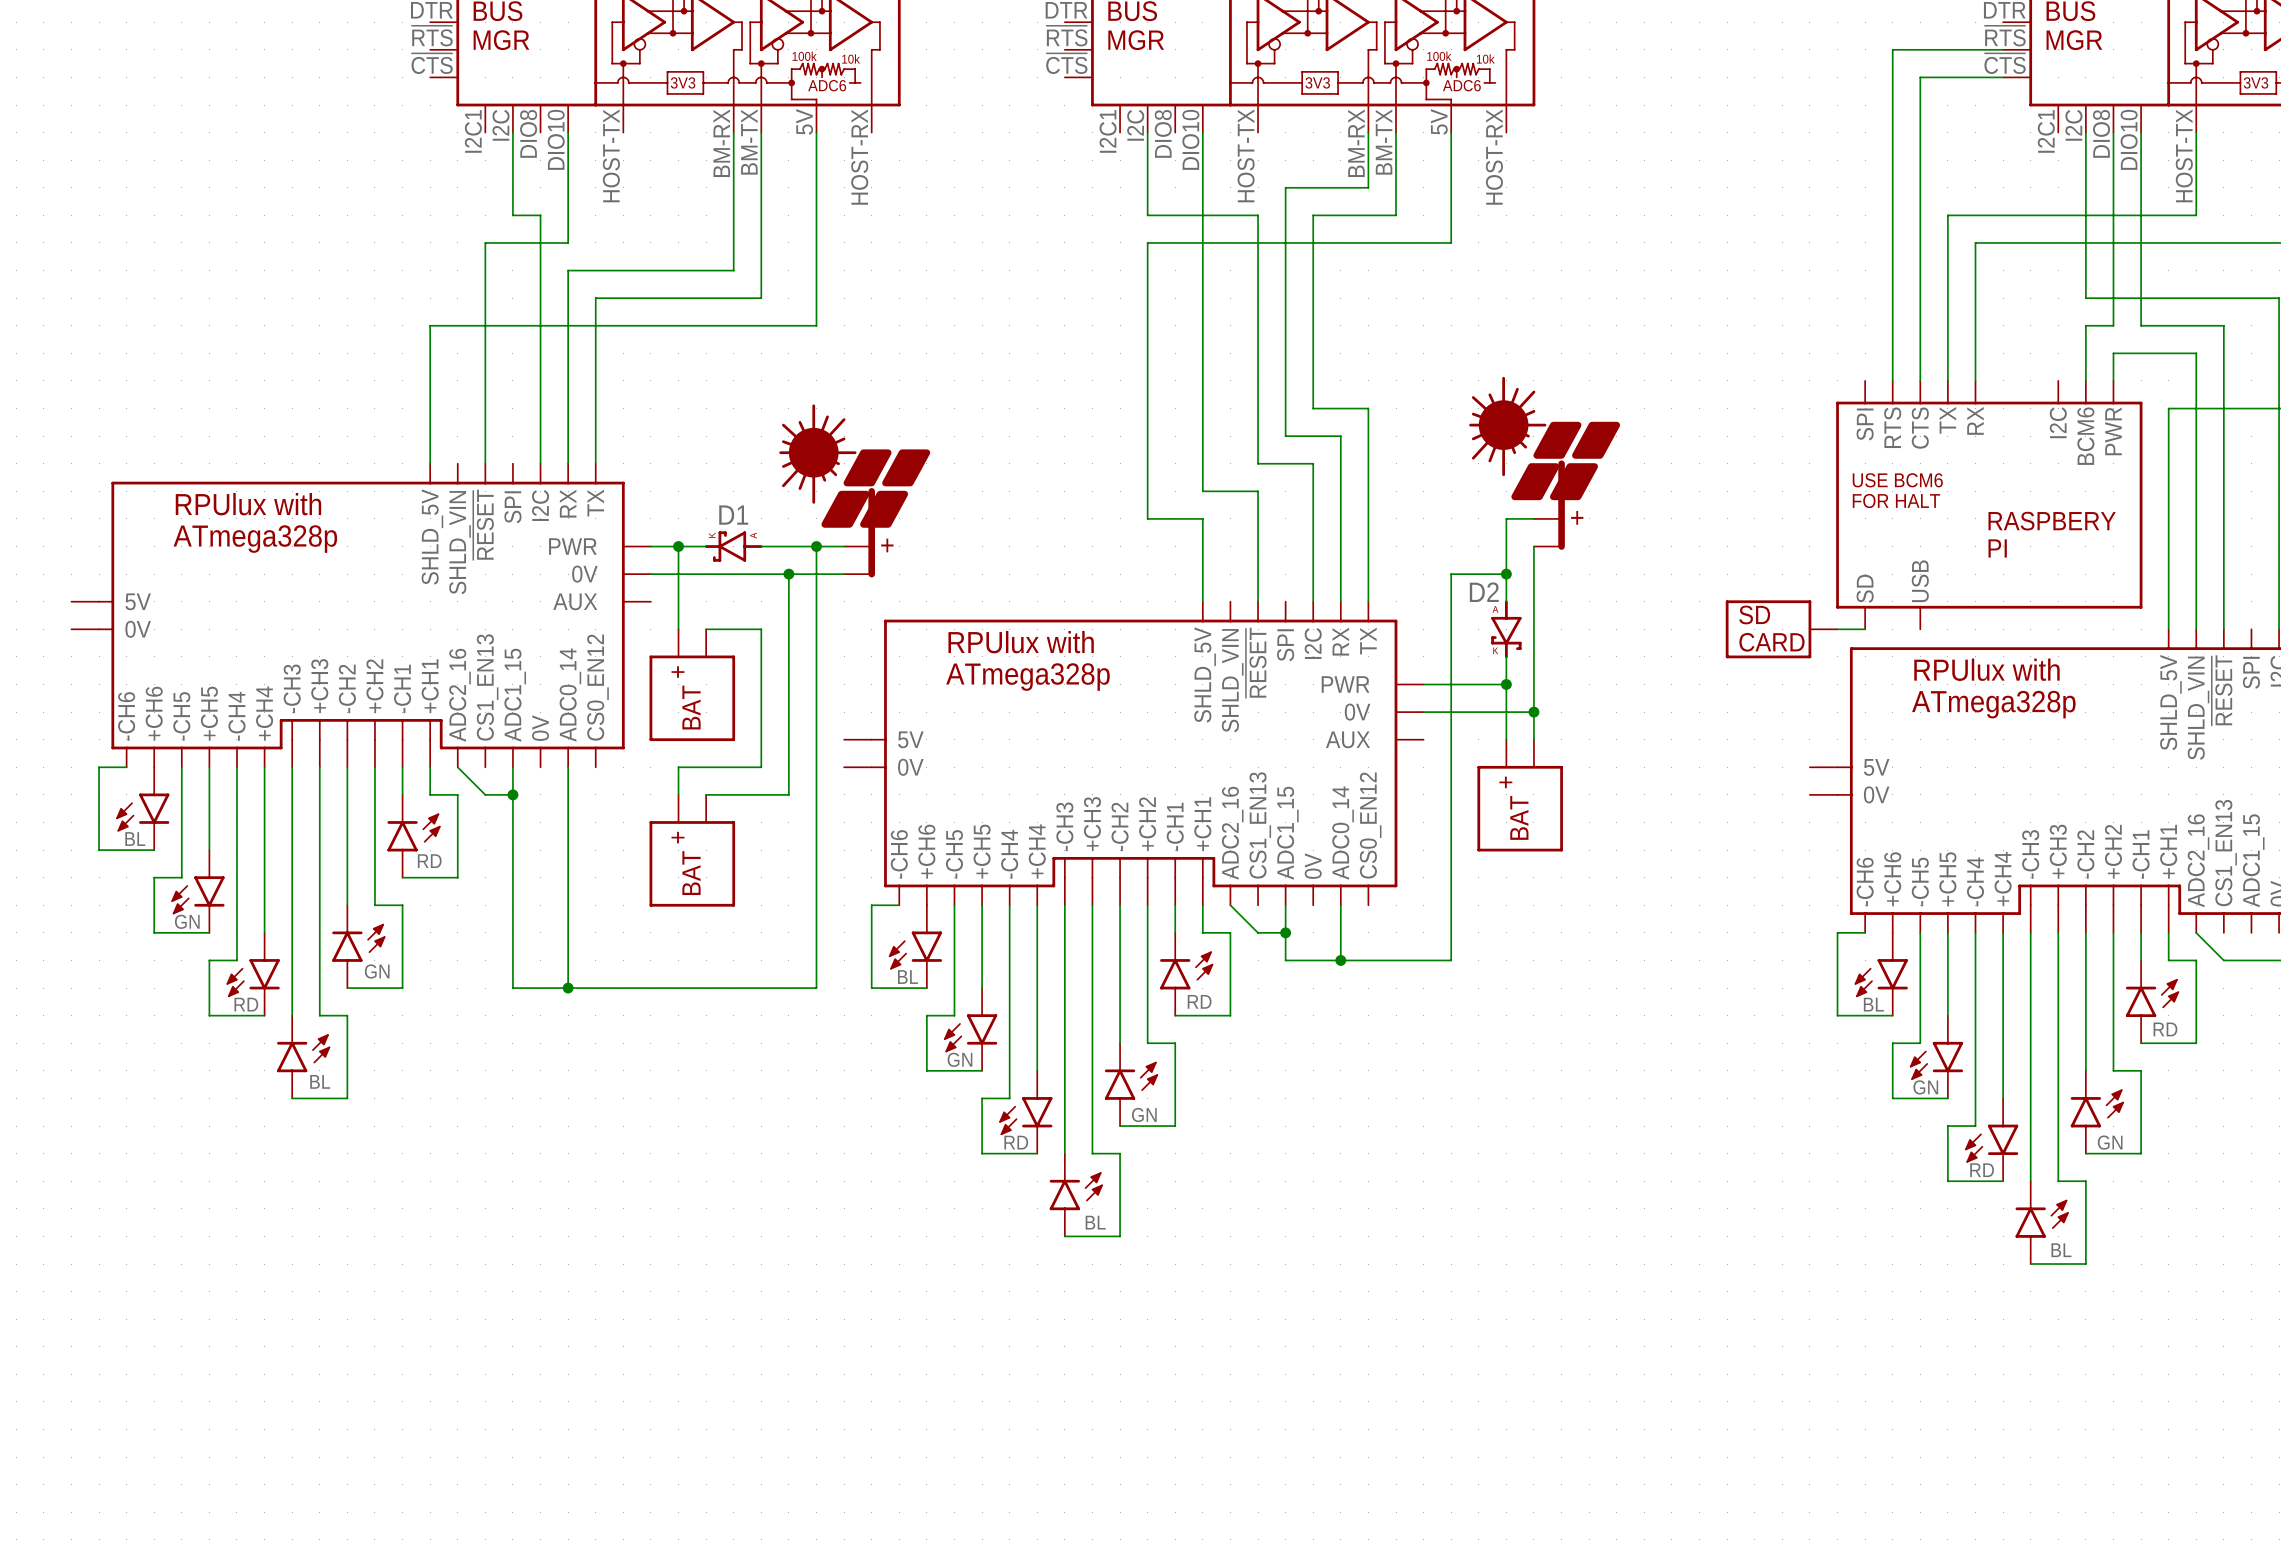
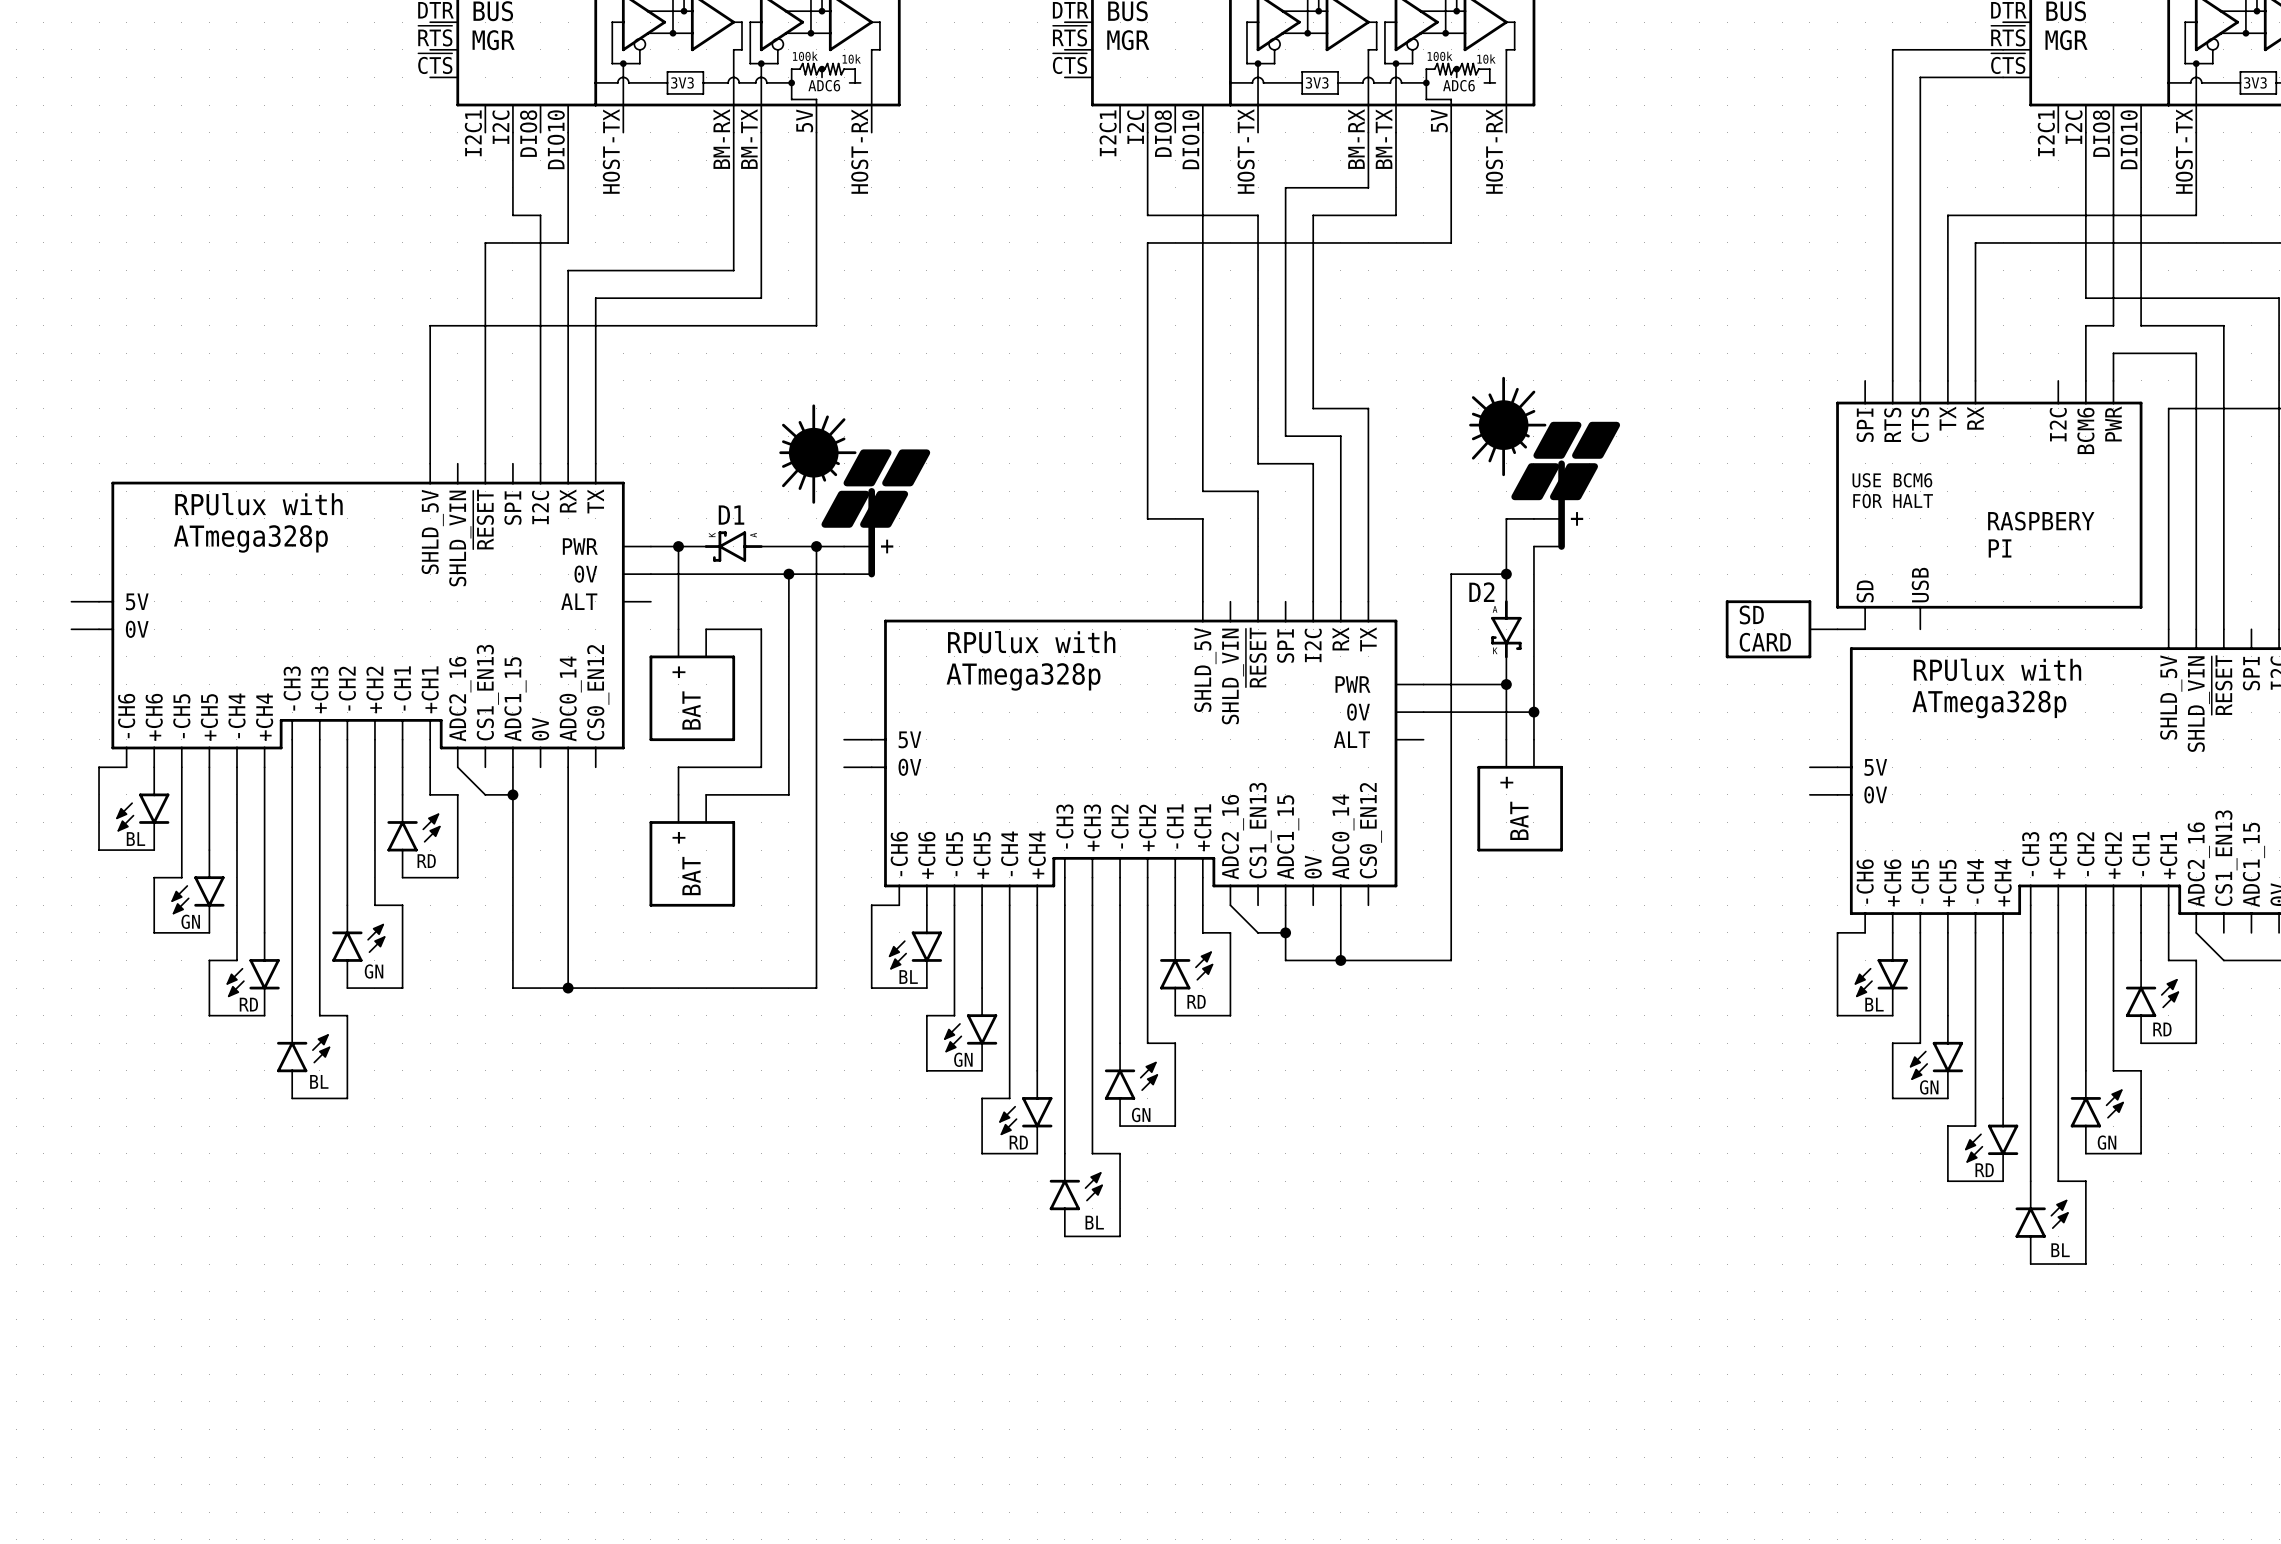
part pin name: AUX (575, 601) -> ALT (579, 601)
part pin name: AUX (1347, 739) -> ALT (1351, 739)

